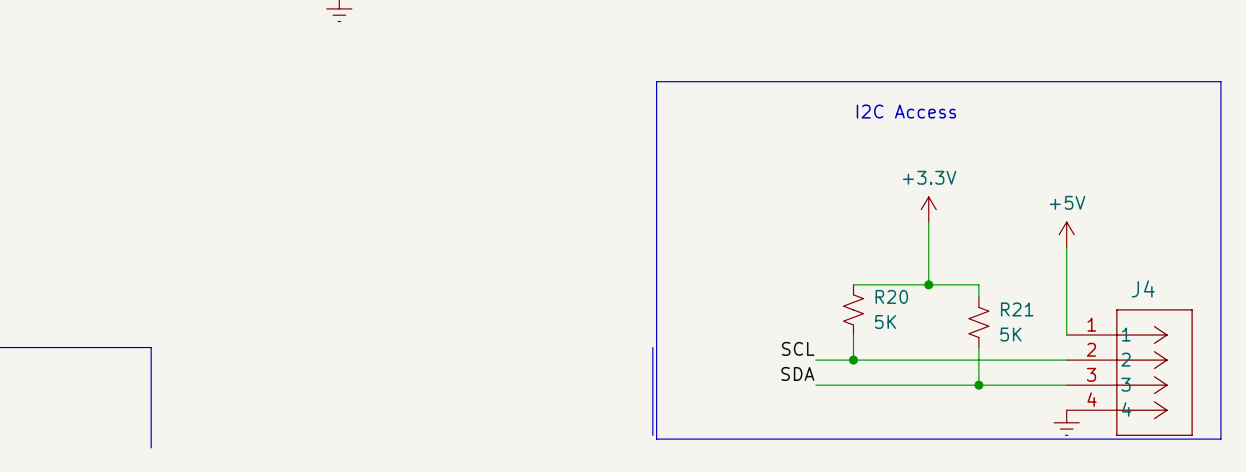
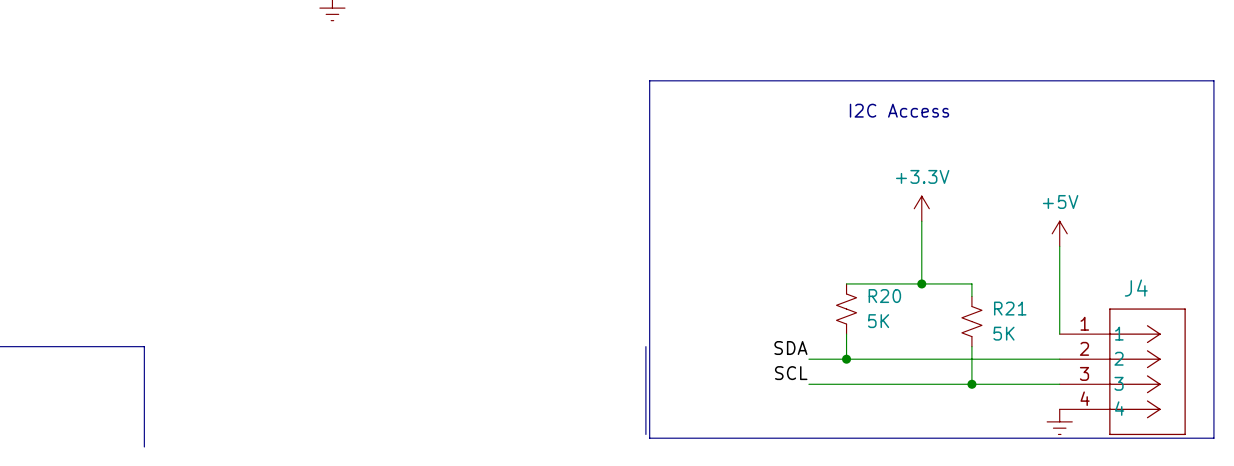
label: SCL (798, 348) -> SDA (790, 348)
label: SDA (797, 373) -> SCL (791, 373)

